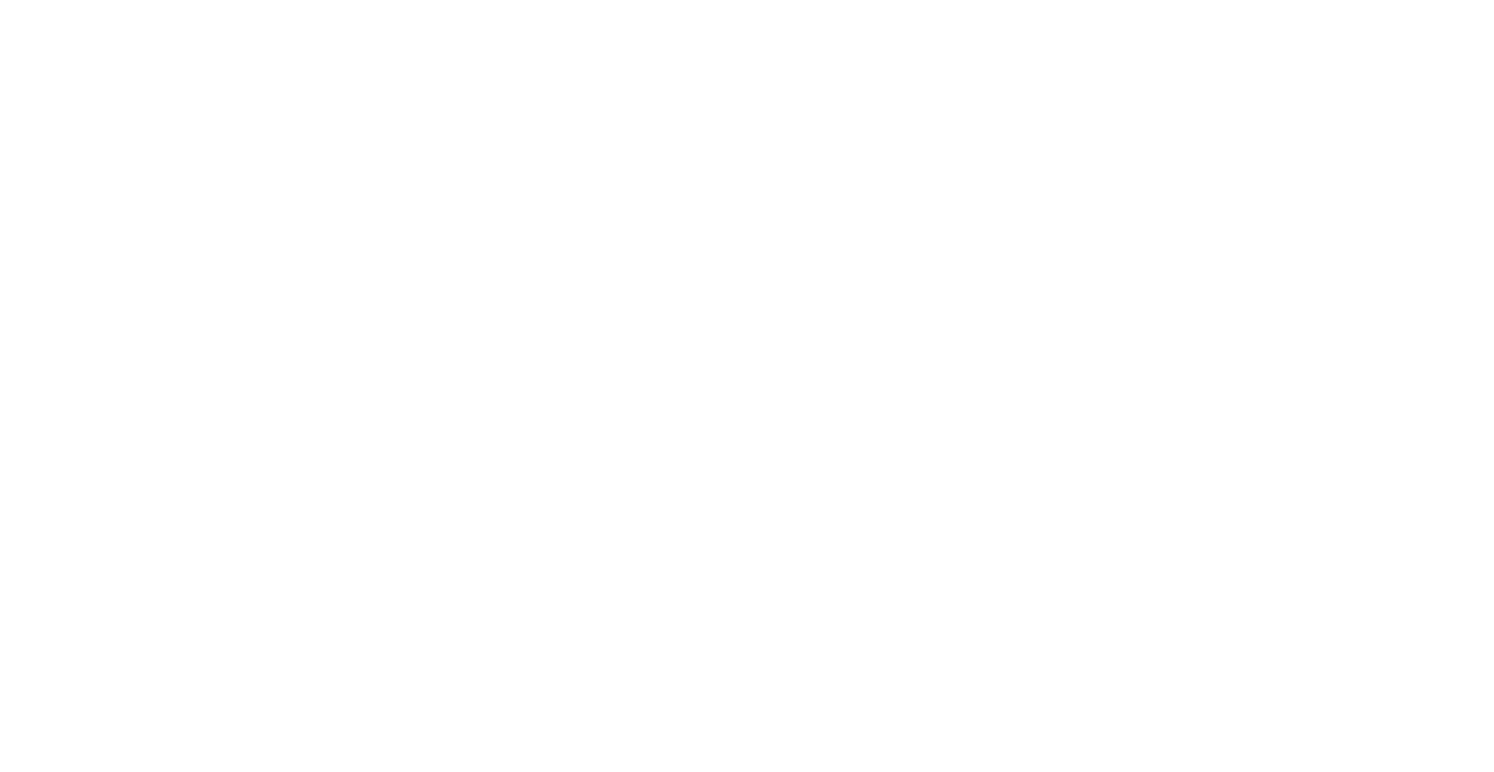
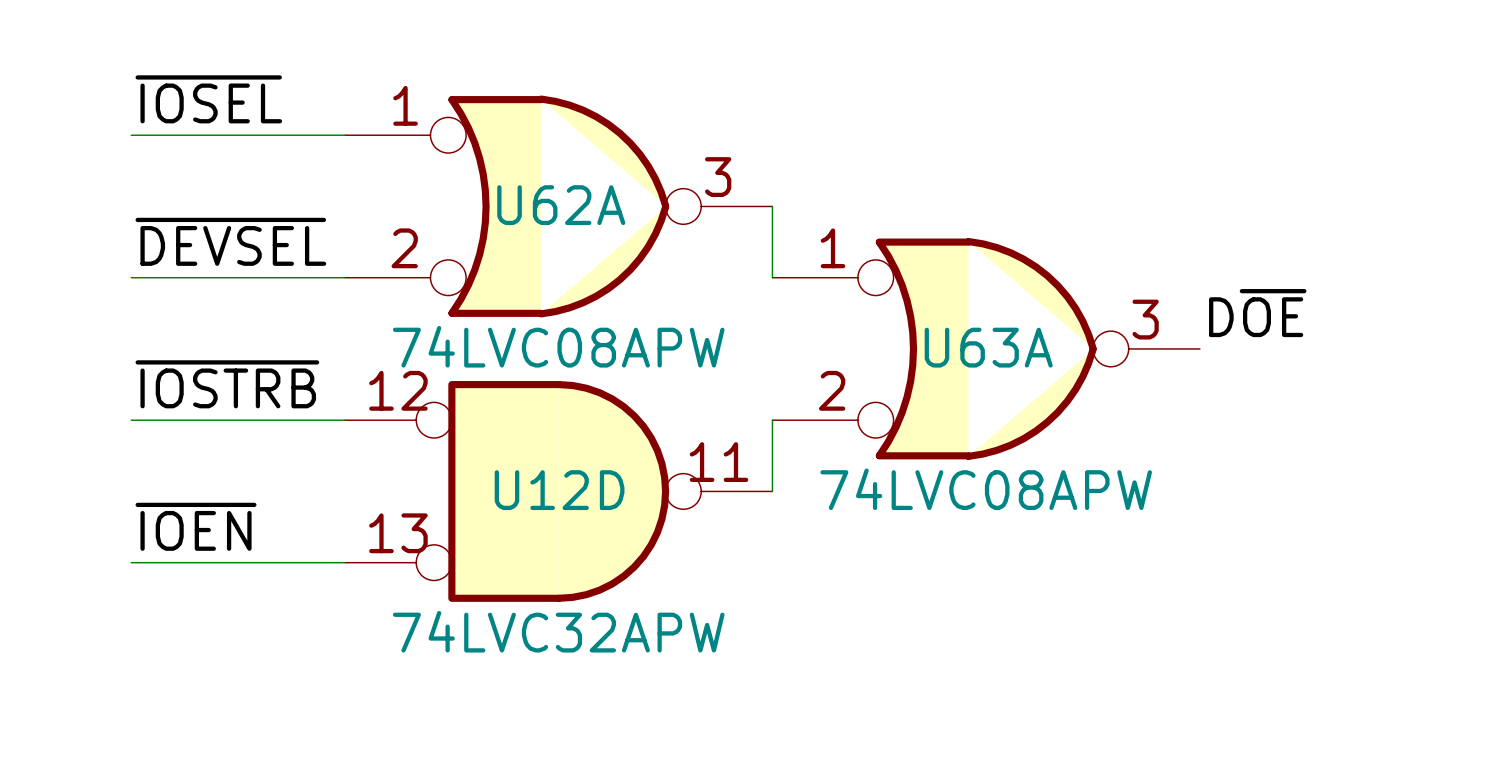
label: none -> ~{IOSEL} (208, 99)
wire: none -> (131, 135) (345, 135)
U62A: none -> 74LVC08APW (558, 206)
wire: none -> (772, 206) (772, 277)
label: none -> ~{DEVSEL} (230, 241)
wire: none -> (131, 277) (345, 277)
label: none -> D~{OE} (1257, 313)
U63A: none -> 74LVC08APW (986, 348)
label: none -> ~{IOSTRB} (227, 384)
wire: none -> (131, 420) (345, 420)
wire: none -> (772, 420) (772, 491)
U12D: none -> 74LVC32APW (558, 491)
label: none -> ~{IOEN} (196, 526)
wire: none -> (131, 562) (345, 562)

